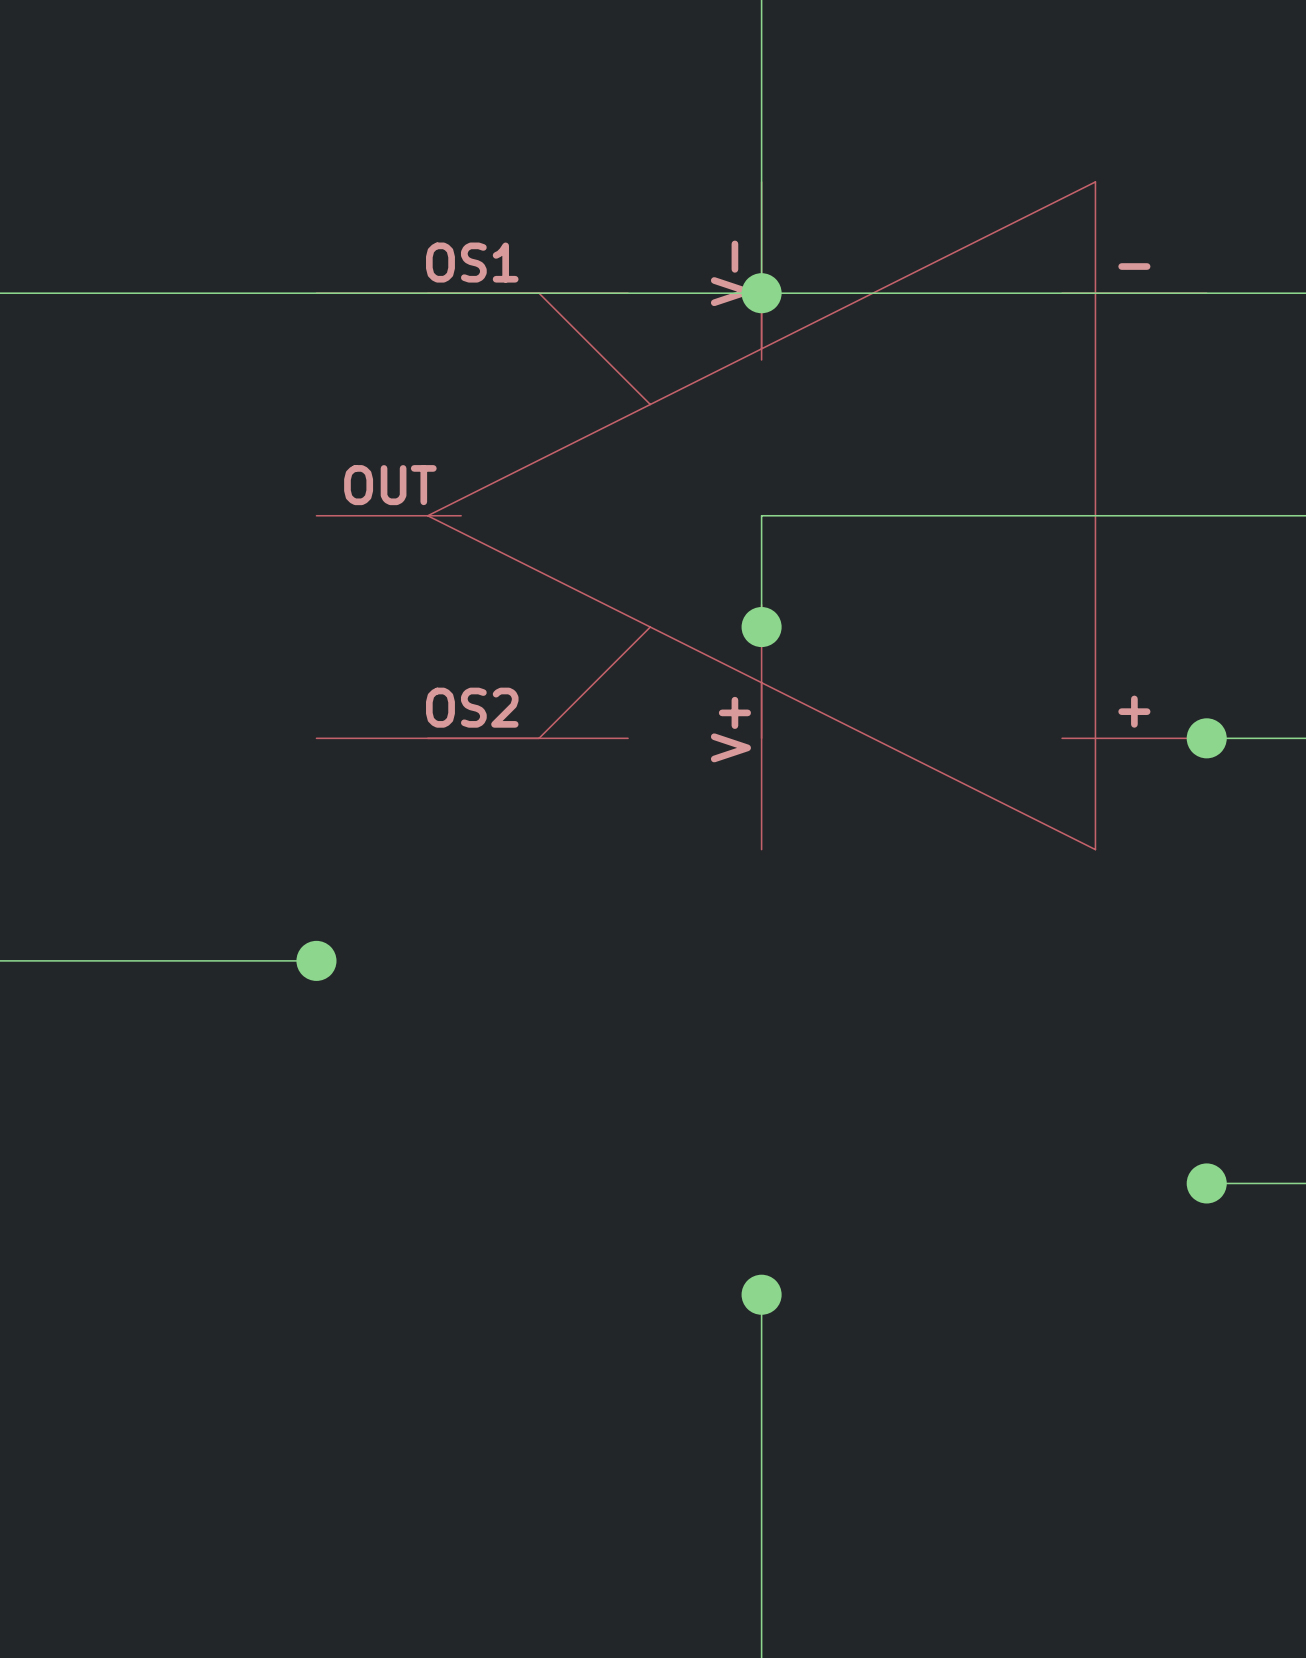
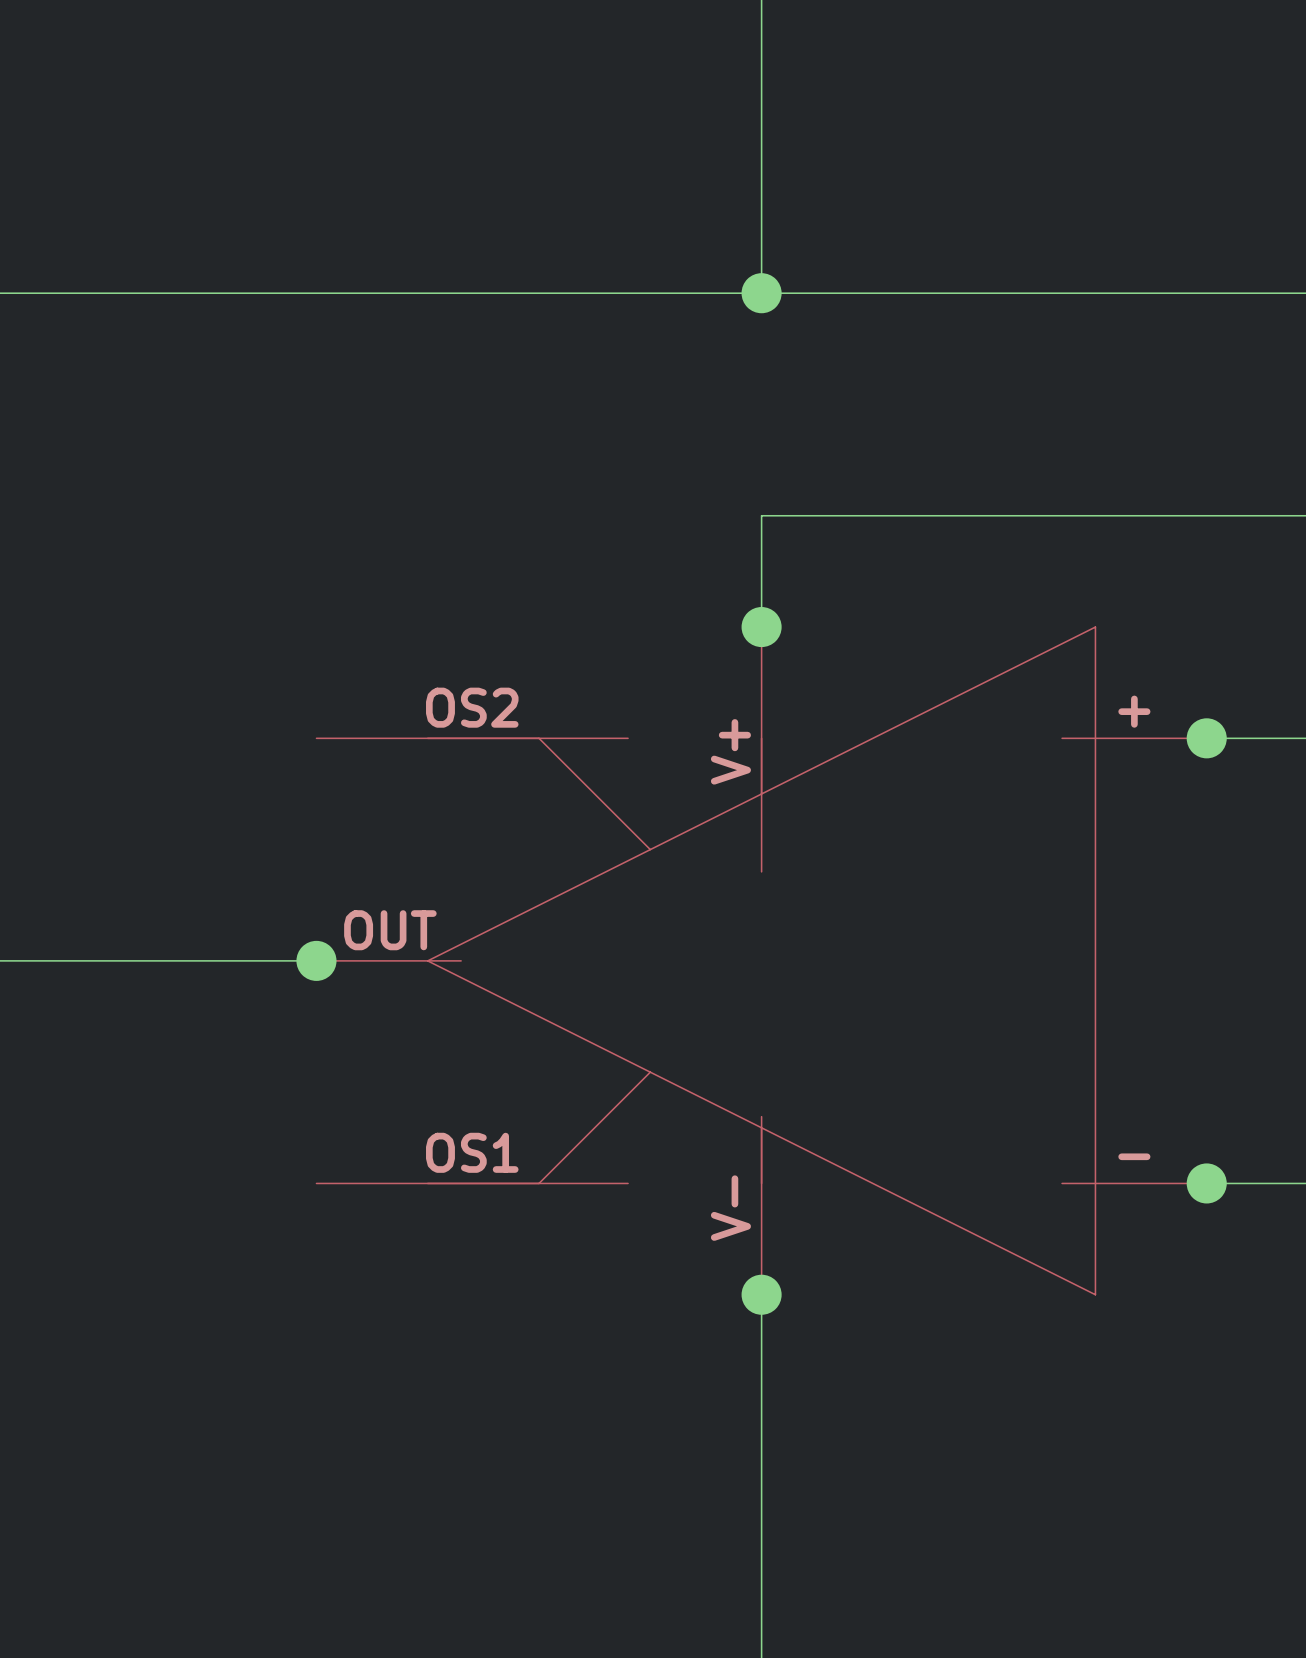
part: (761, 515) -> none
part: none -> (761, 960)

